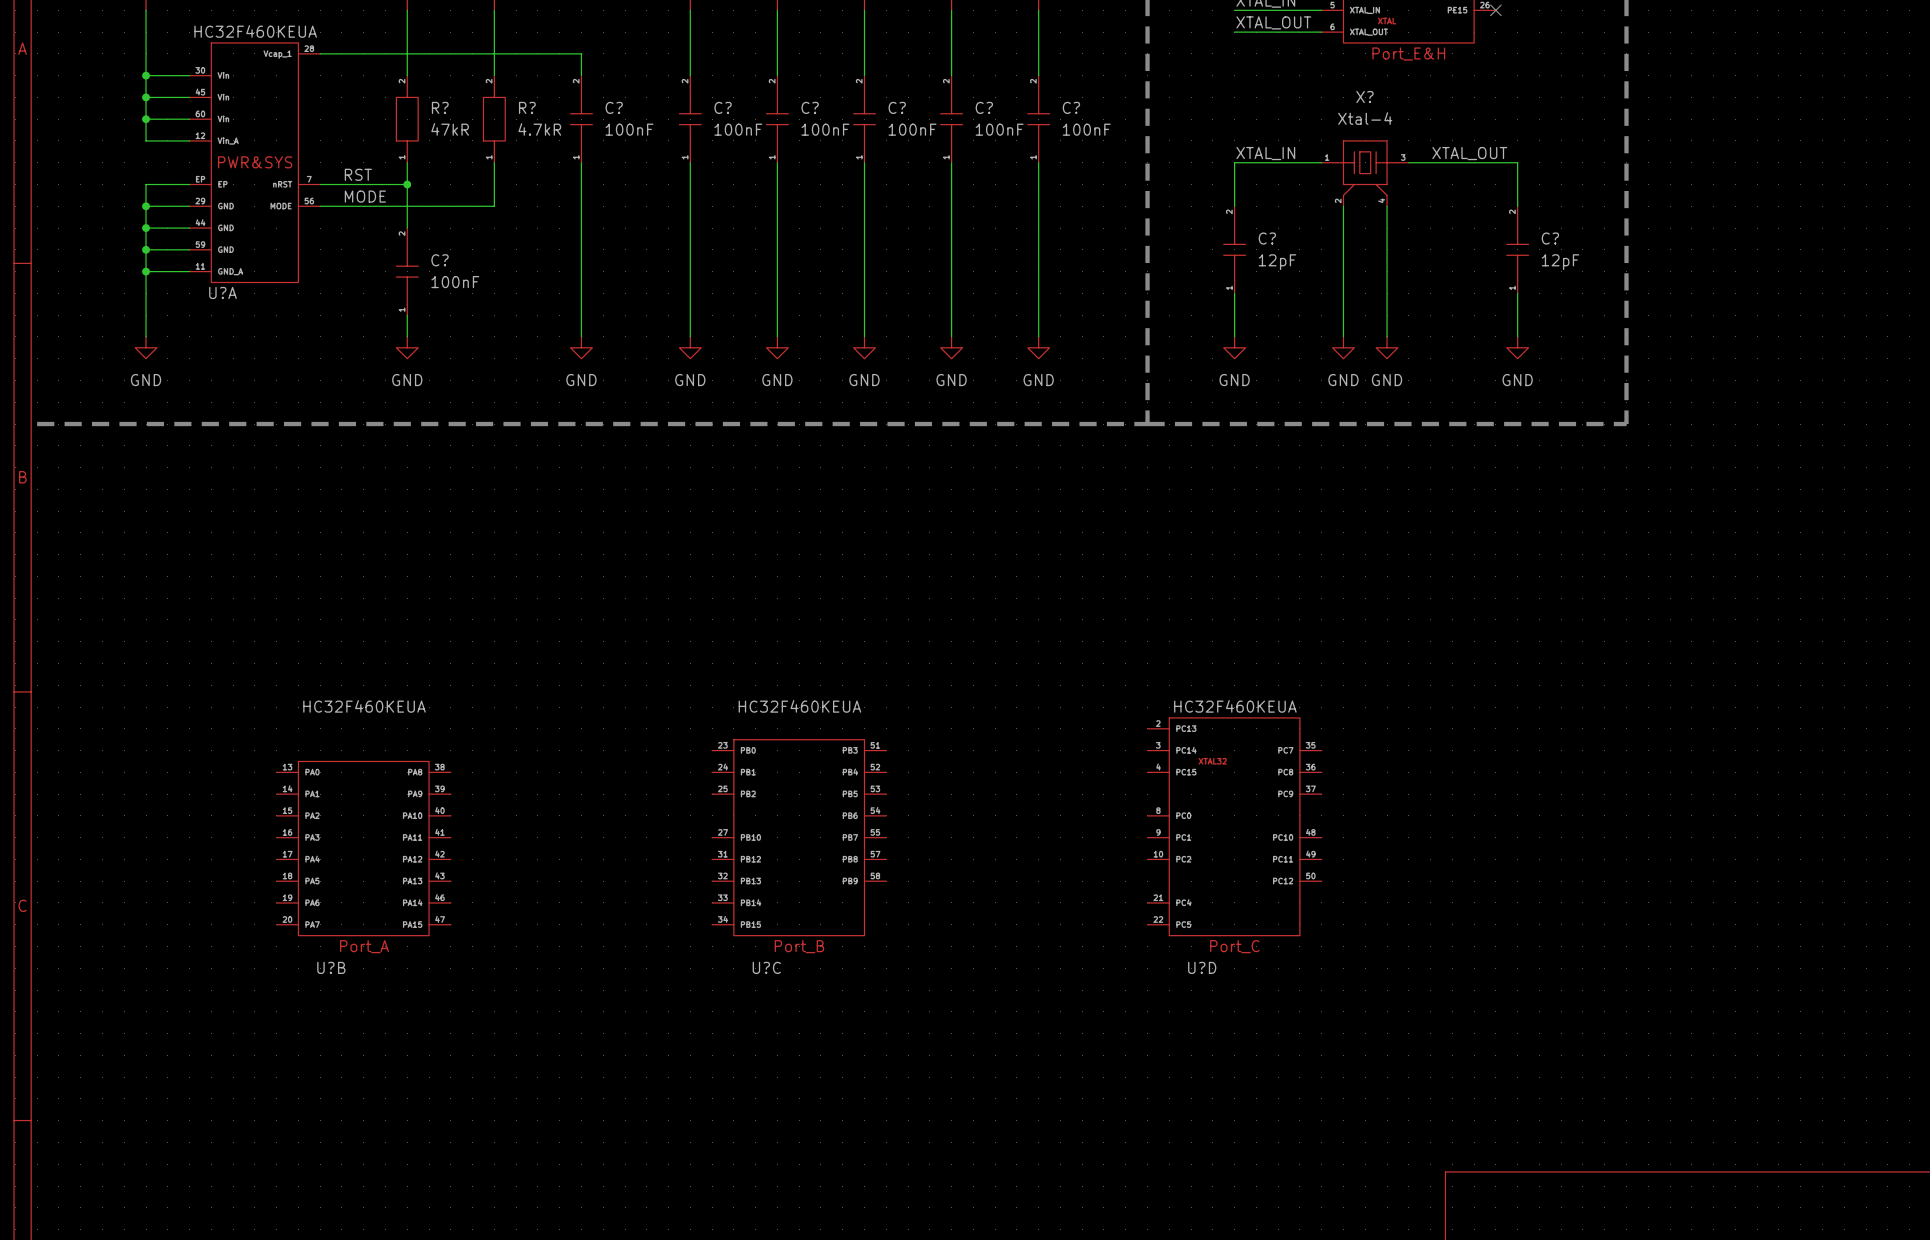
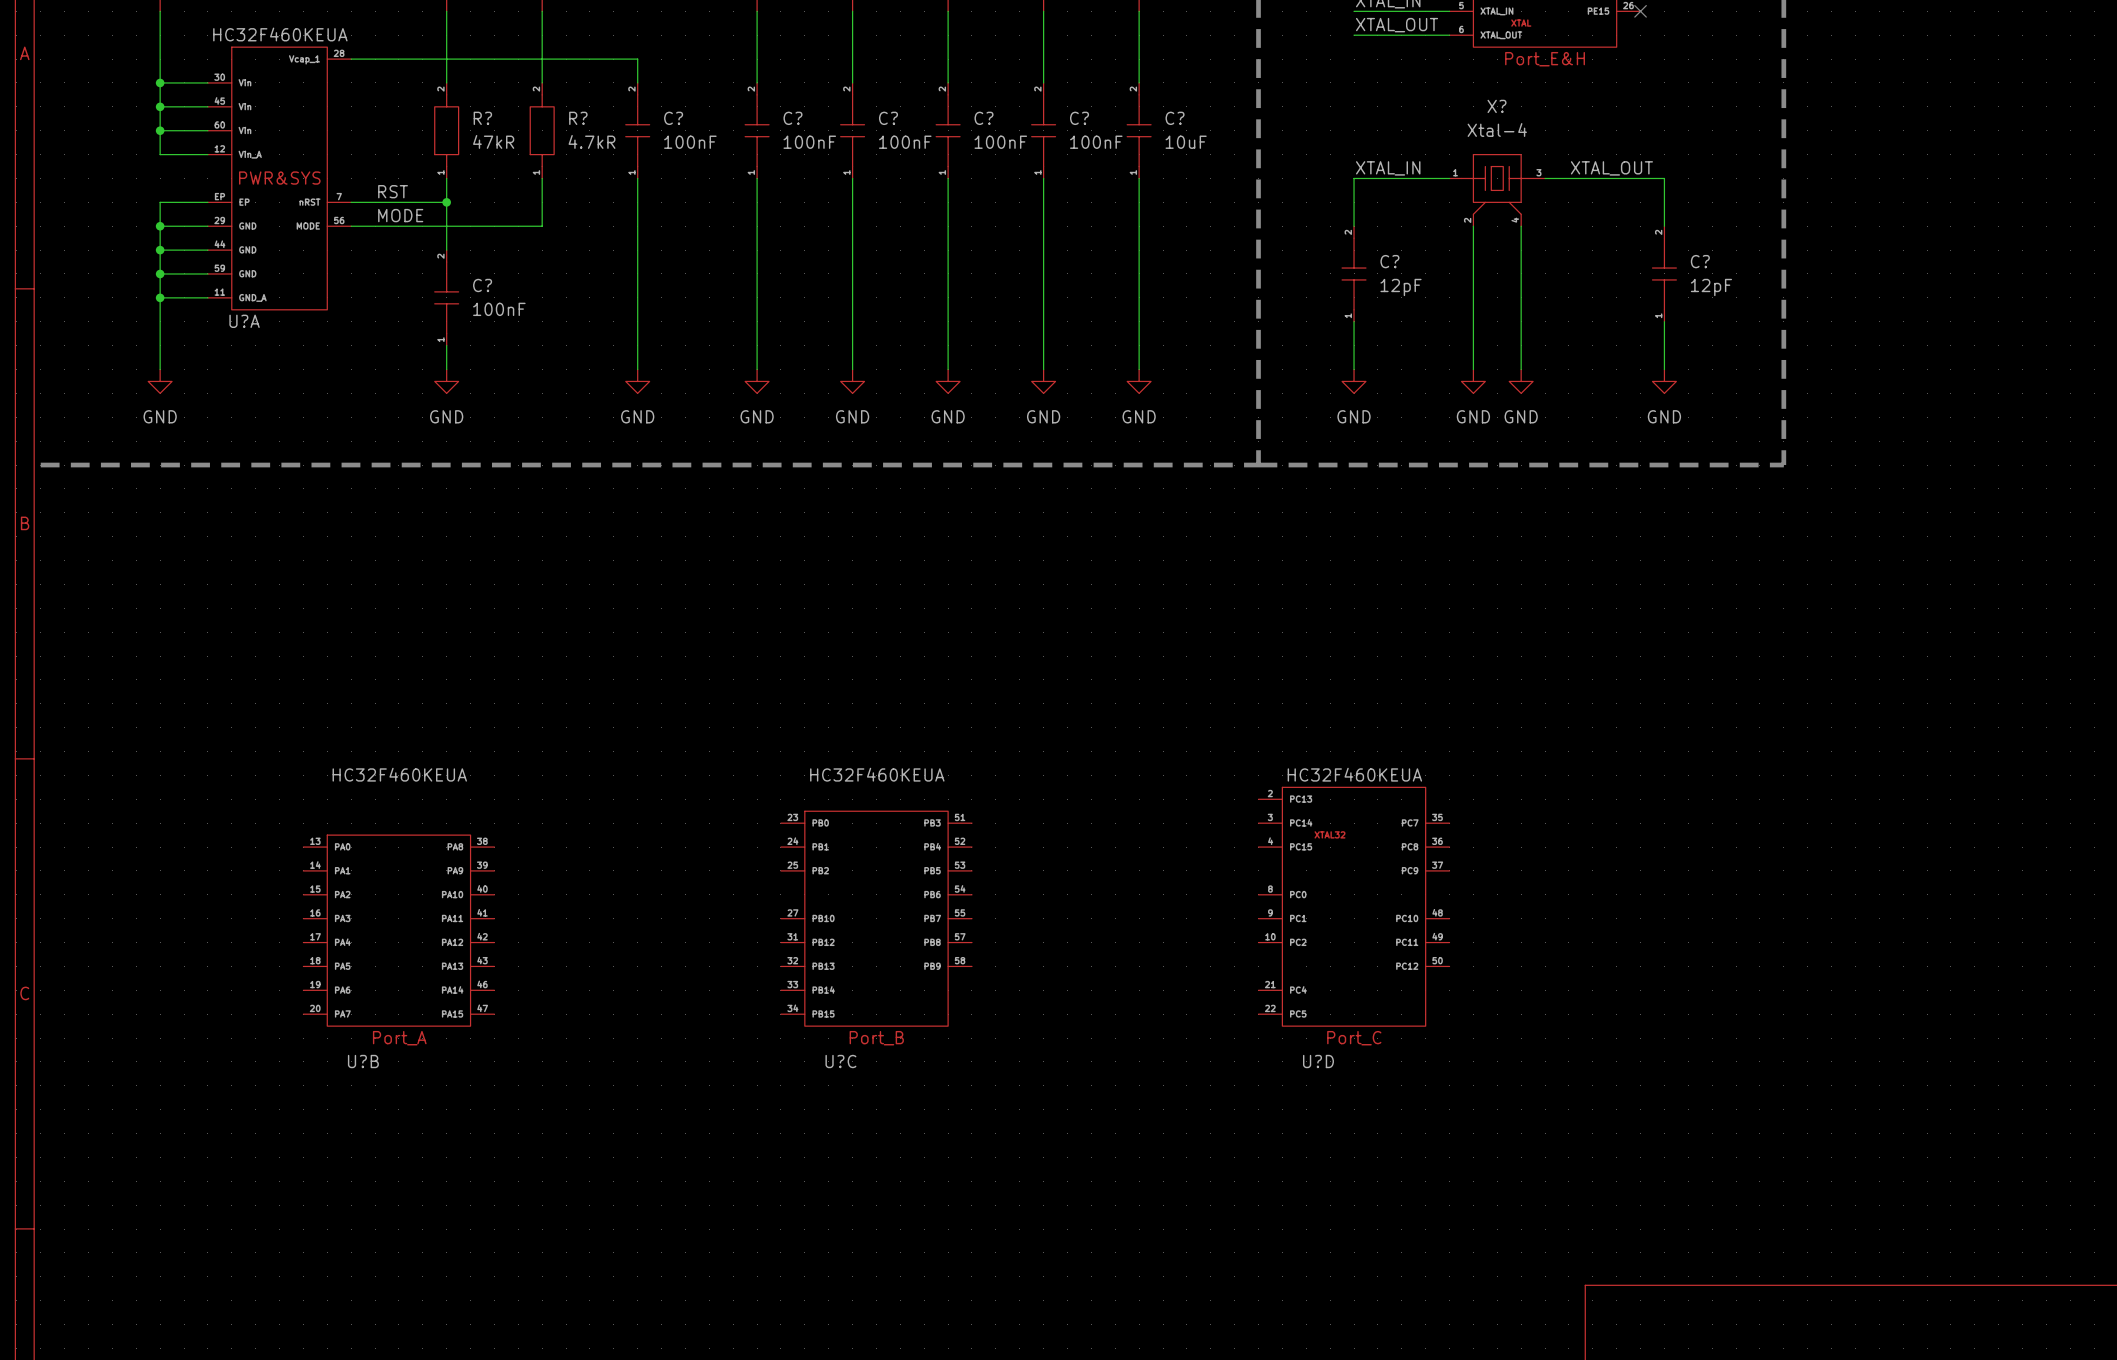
C? value: 100nF (1086, 129) -> 10uF (1186, 142)

